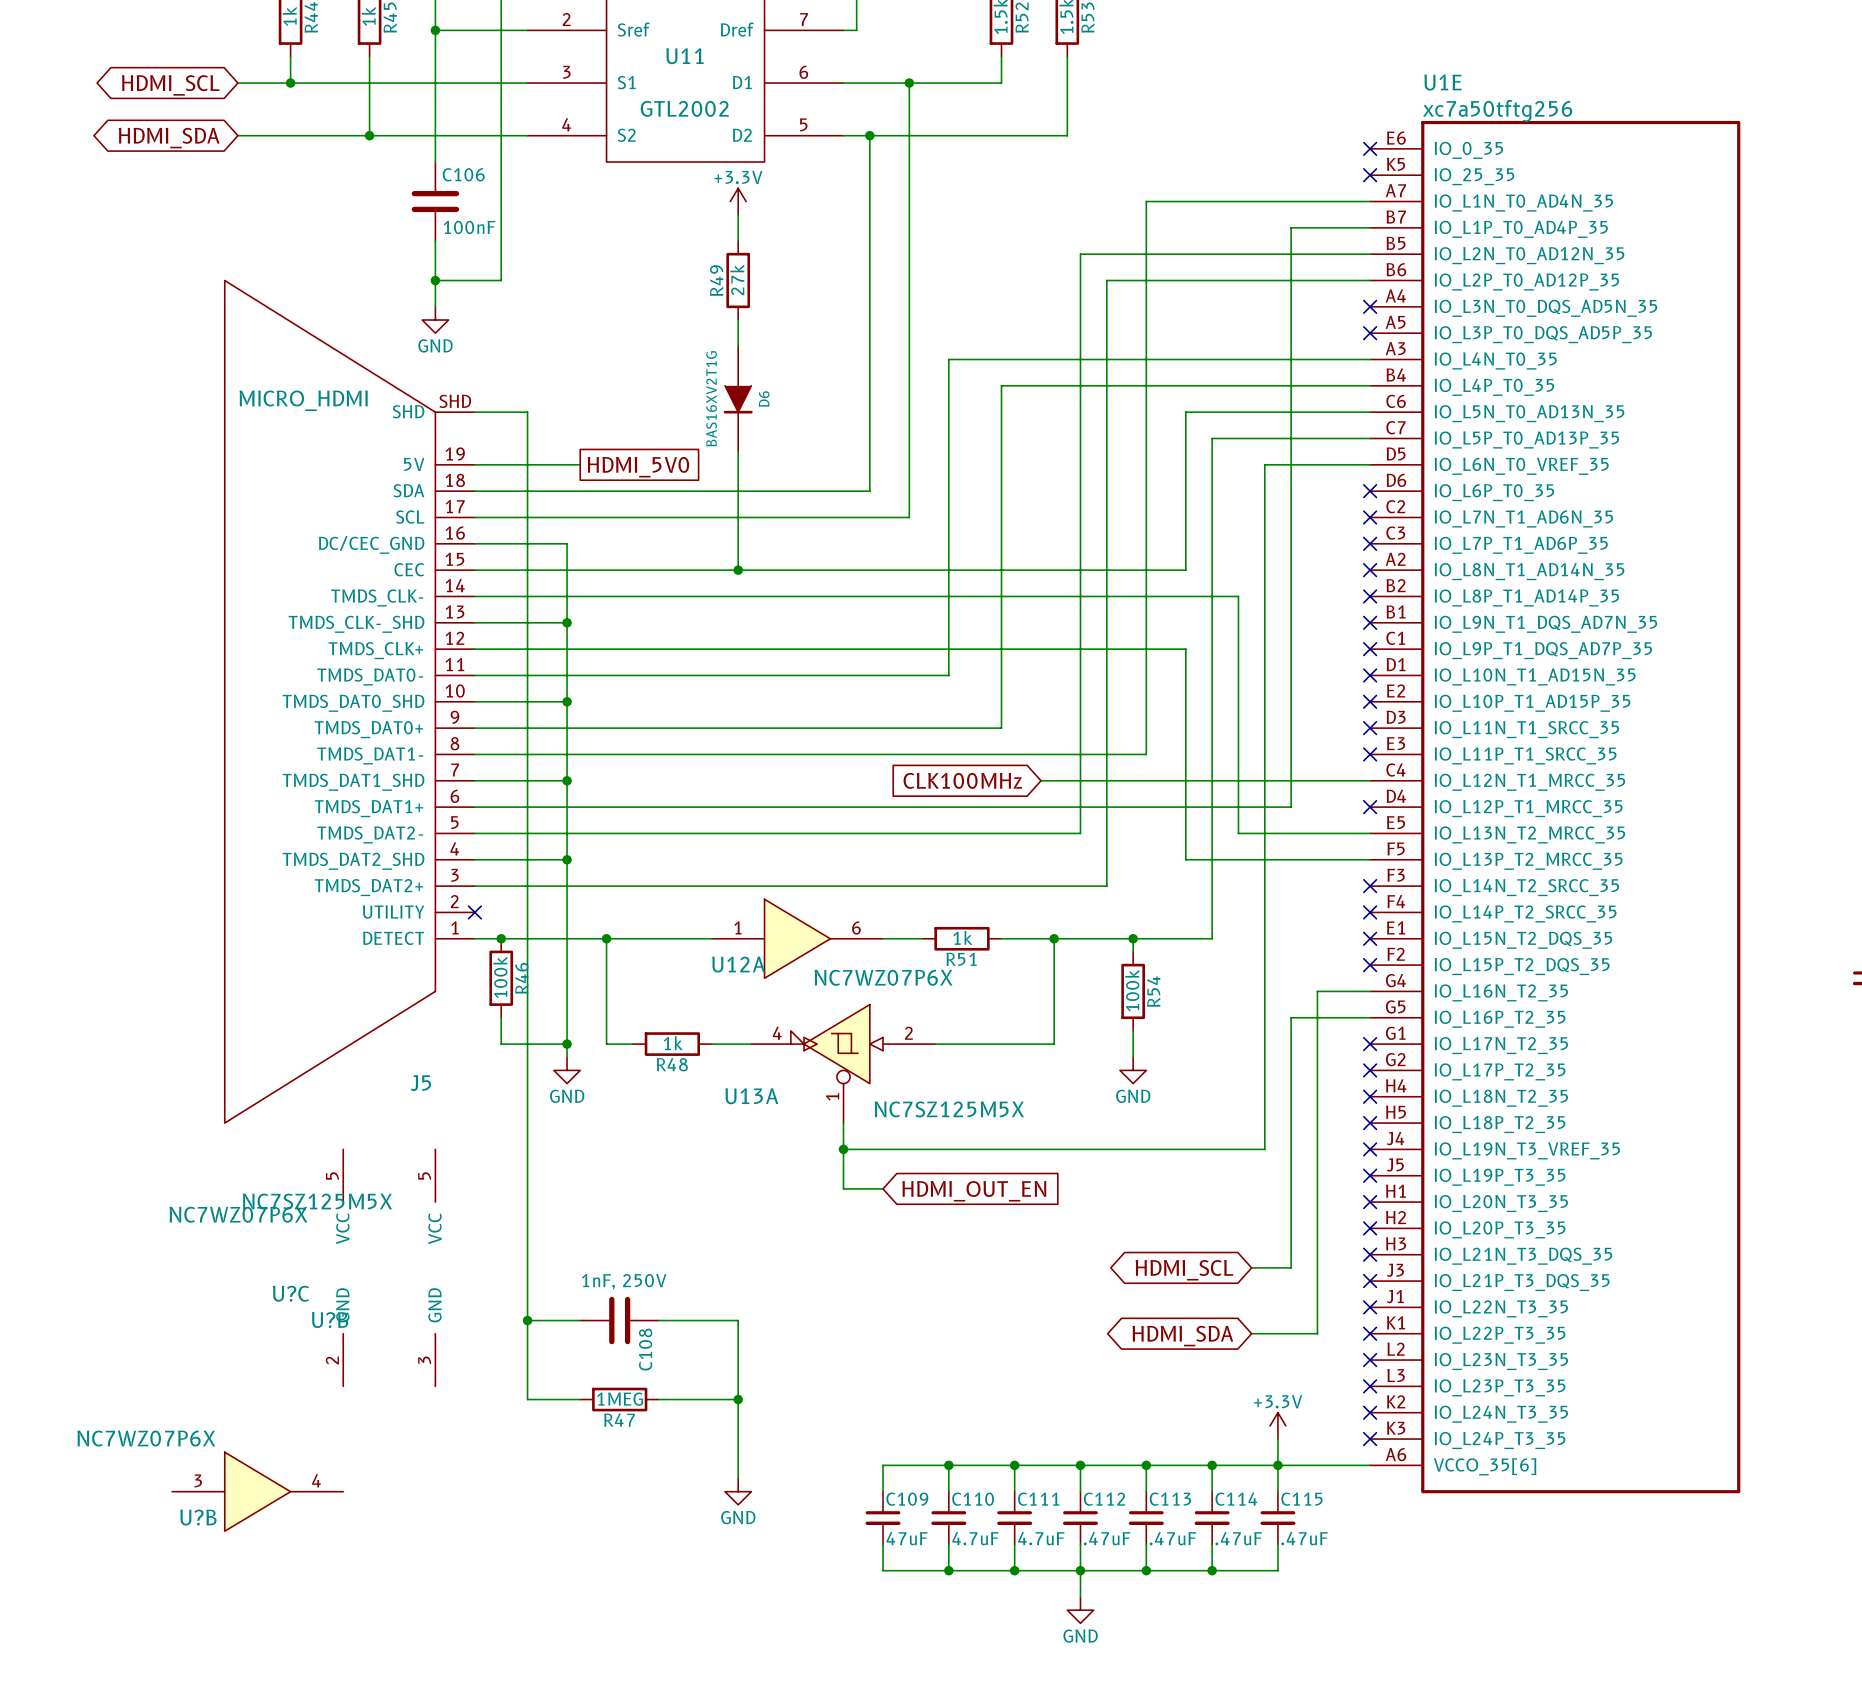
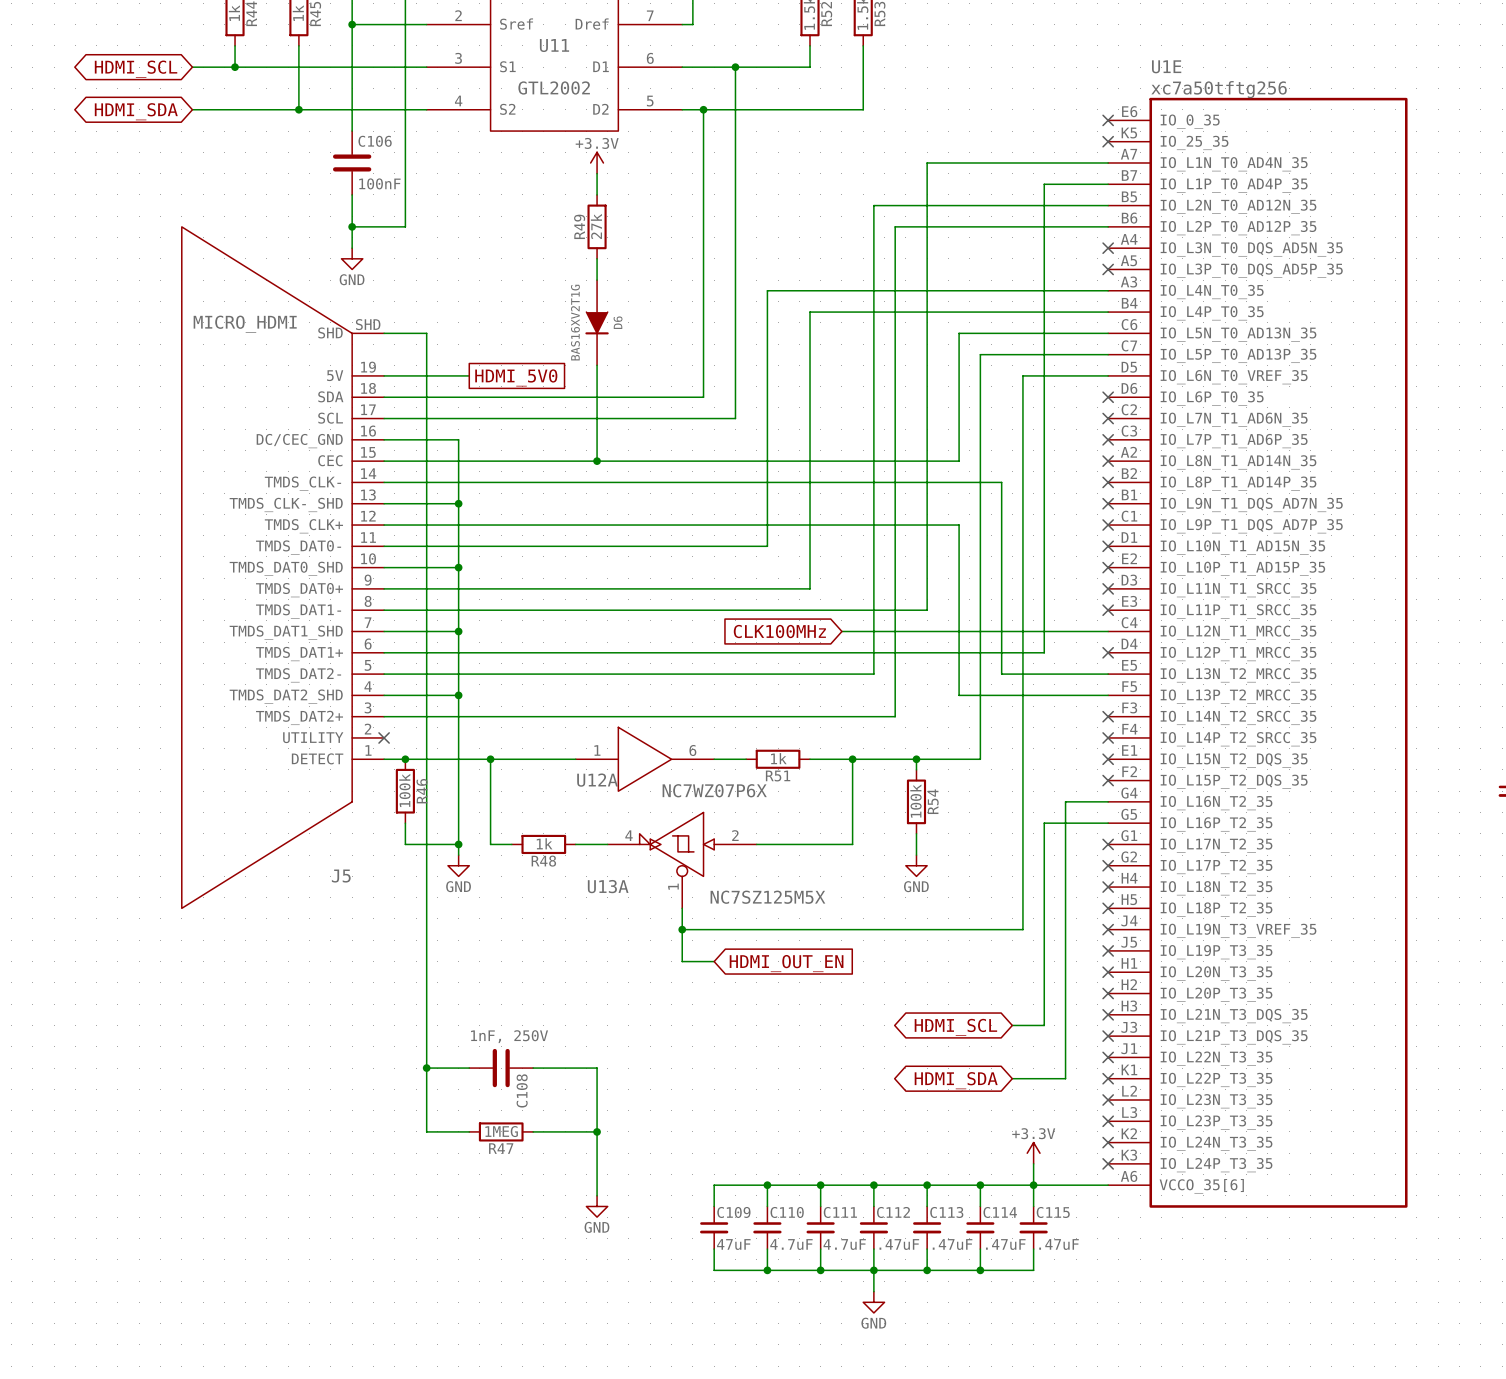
U?C: NC7WZ07P6X (343, 1267) -> none
U?B: NC7SZ125M5X (435, 1267) -> none
U?B: NC7WZ07P6X (257, 1491) -> none

